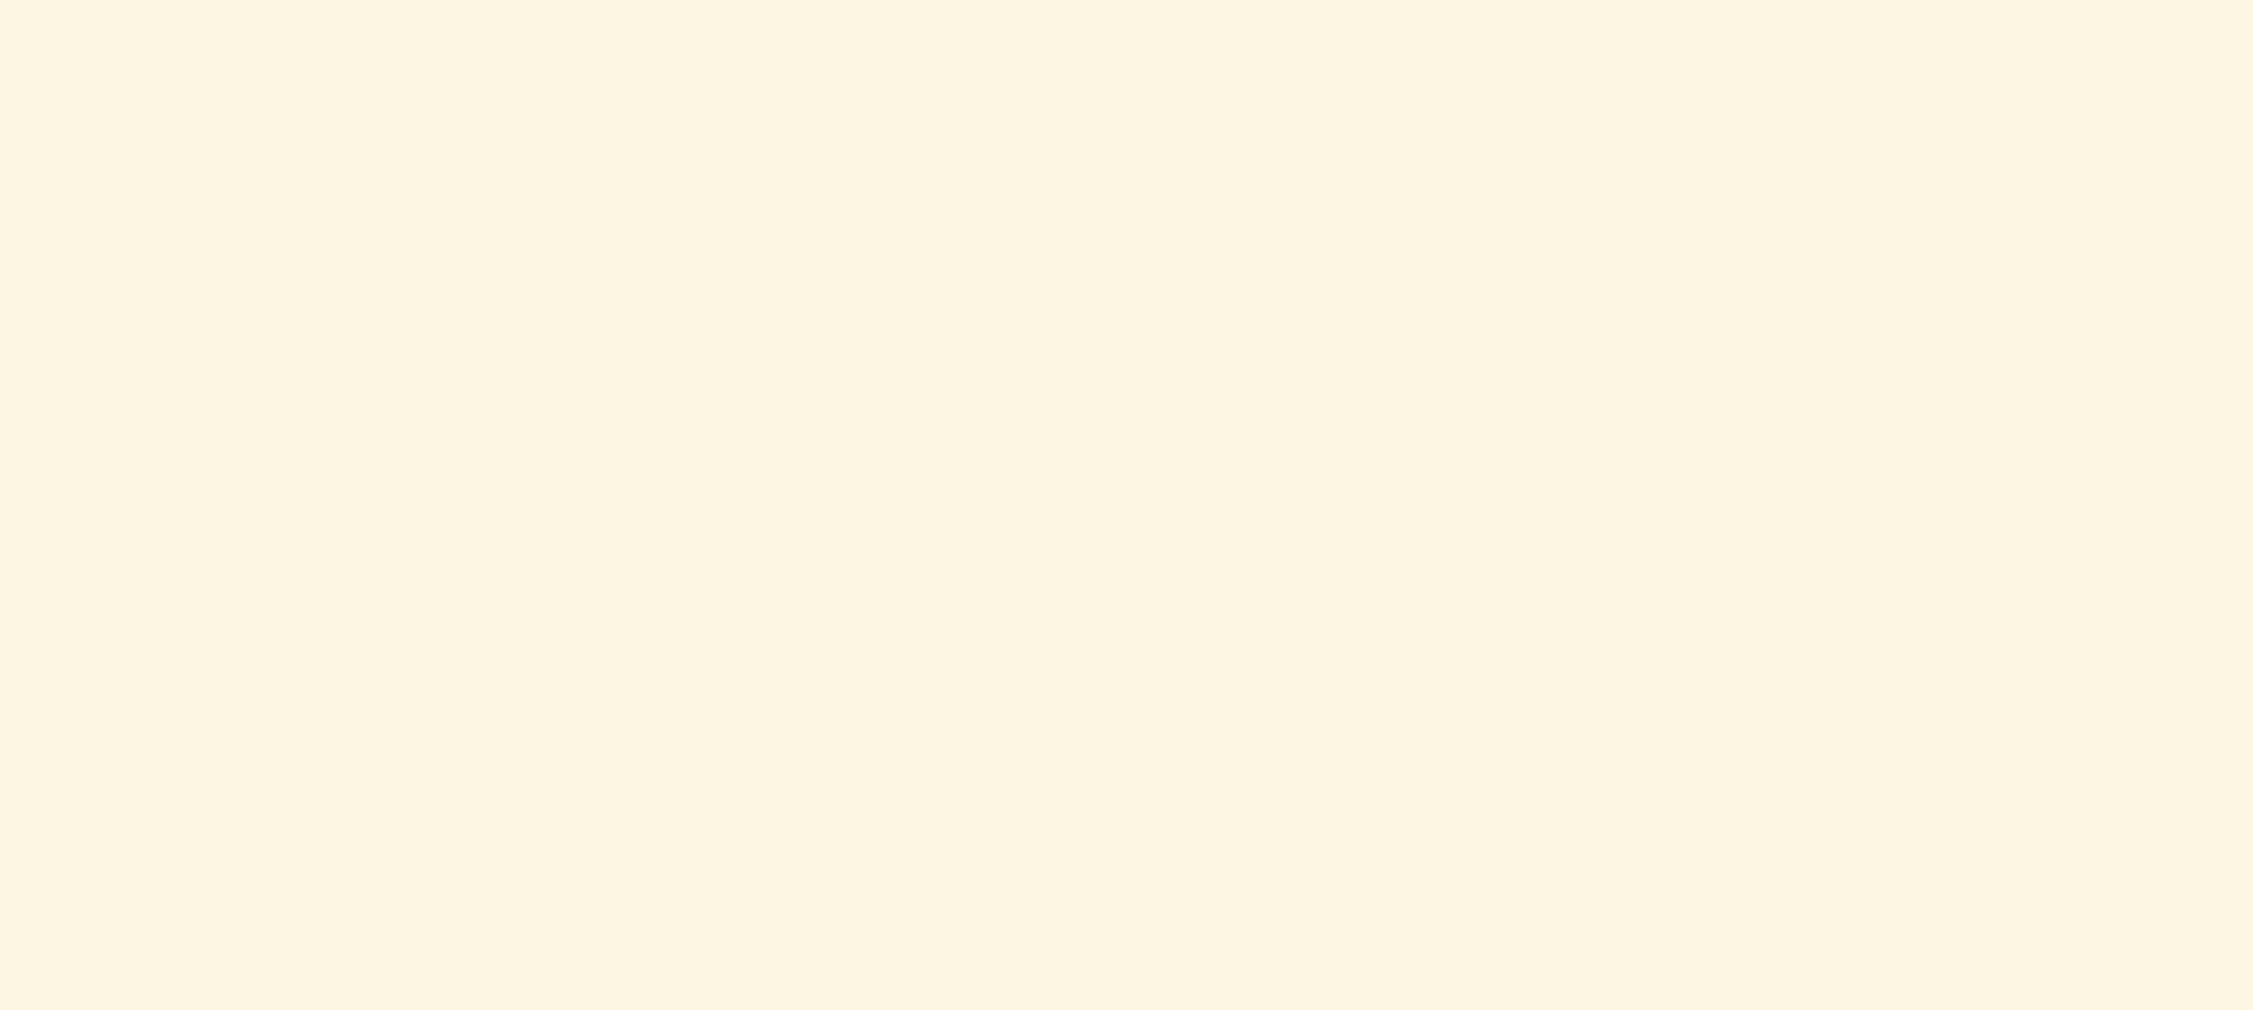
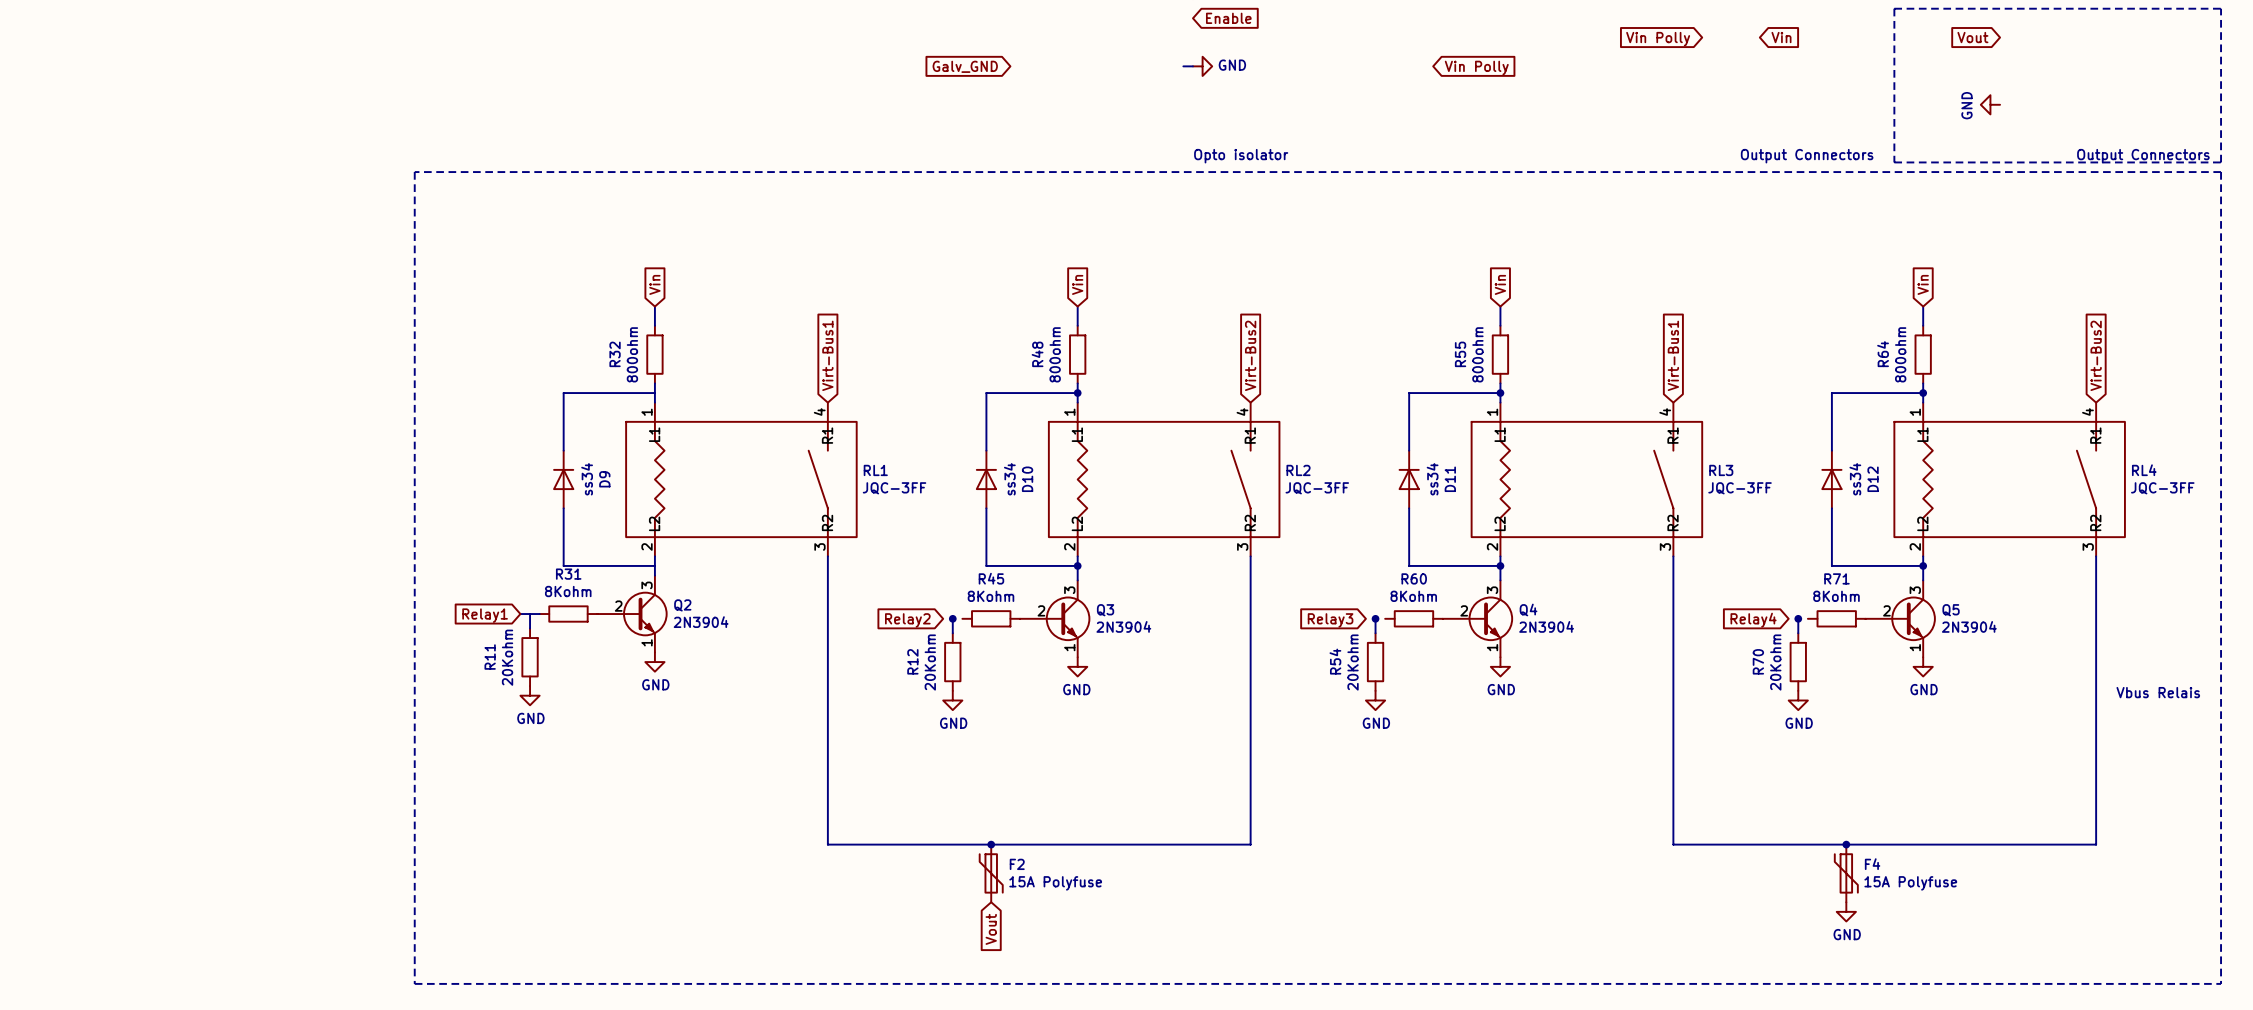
line: none -> (1894, 8) (2221, 8) (2221, 162) (1894, 162) (1894, 8)
global label: none -> Enable (1228, 18)
global label: none -> Vin (1781, 37)
global label: none -> Vout (1972, 37)
global label: none -> Vin Polly (1658, 39)
wire: none -> (1183, 66) (1192, 66)
power symbol: none -> GND (1202, 66)
global label: none -> Galv_GND (965, 66)
global label: none -> Vin Polly (1476, 67)
power symbol: none -> GND (1990, 104)
text: none -> Opto isolator (1241, 156)
text: none -> Output Connectors (1807, 156)
text: none -> Output Connectors (2143, 156)
line: none -> (414, 172) (414, 983) (2221, 983) (2221, 172) (414, 172)
global label: none -> Vin (654, 284)
global label: none -> Vin (1077, 284)
global label: none -> Vin (1500, 284)
global label: none -> Vin (1923, 284)
wire: none -> (654, 306) (654, 325)
wire: none -> (1077, 306) (1077, 325)
wire: none -> (1500, 306) (1500, 325)
wire: none -> (1923, 306) (1923, 325)
R32: none -> 800ohm (654, 354)
R48: none -> 800ohm (1077, 354)
R55: none -> 800ohm (1500, 354)
R64: none -> 800ohm (1923, 354)
global label: none -> Virt-Bus1 (827, 355)
global label: none -> Virt-Bus2 (1250, 355)
global label: none -> Virt-Bus1 (1673, 355)
global label: none -> Virt-Bus2 (2096, 355)
wire: none -> (654, 383) (654, 402)
wire: none -> (1077, 383) (1077, 402)
wire: none -> (1500, 383) (1500, 402)
wire: none -> (1923, 383) (1923, 402)
wire: none -> (654, 393) (563, 393) (563, 450)
wire: none -> (1077, 393) (986, 393) (986, 450)
junction: none -> (1077, 393)
wire: none -> (1500, 393) (1409, 393) (1409, 450)
junction: none -> (1500, 393)
wire: none -> (1923, 393) (1831, 393) (1831, 450)
junction: none -> (1923, 393)
D9: none -> ss34 (563, 479)
RL1: none -> JQC-3FF (741, 479)
D10: none -> ss34 (986, 479)
RL2: none -> JQC-3FF (1164, 479)
D11: none -> ss34 (1409, 479)
RL3: none -> JQC-3FF (1586, 479)
D12: none -> ss34 (1831, 479)
RL4: none -> JQC-3FF (2009, 479)
wire: none -> (563, 508) (563, 565) (654, 565)
wire: none -> (986, 508) (986, 565) (1077, 565)
wire: none -> (1409, 508) (1409, 565) (1500, 565)
wire: none -> (1831, 508) (1831, 565) (1923, 565)
wire: none -> (654, 556) (654, 575)
wire: none -> (827, 556) (827, 844) (1250, 844) (1250, 556)
wire: none -> (1077, 556) (1077, 580)
wire: none -> (1500, 556) (1500, 580)
wire: none -> (1673, 556) (1673, 844) (2096, 844) (2096, 556)
wire: none -> (1923, 556) (1923, 580)
junction: none -> (1077, 565)
junction: none -> (1500, 565)
junction: none -> (1923, 565)
wire: none -> (520, 614) (539, 614)
wire: none -> (530, 614) (530, 628)
R31: none -> 8Kohm (568, 614)
Q2: none -> 2N3904 (632, 614)
global label: none -> Relay1 (485, 615)
wire: none -> (952, 618) (952, 633)
junction: none -> (952, 618)
R45: none -> 8Kohm (991, 618)
Q3: none -> 2N3904 (1055, 618)
wire: none -> (1375, 618) (1375, 633)
junction: none -> (1375, 618)
R60: none -> 8Kohm (1413, 618)
Q4: none -> 2N3904 (1477, 618)
wire: none -> (1798, 618) (1798, 633)
junction: none -> (1798, 618)
R71: none -> 8Kohm (1836, 618)
Q5: none -> 2N3904 (1900, 618)
global label: none -> Relay2 (907, 620)
global label: none -> Relay3 (1330, 620)
global label: none -> Relay4 (1753, 620)
R11: none -> 20Kohm (530, 657)
power symbol: none -> GND (654, 662)
R12: none -> 20Kohm (952, 662)
R54: none -> 20Kohm (1375, 662)
R70: none -> 20Kohm (1798, 662)
power symbol: none -> GND (1077, 666)
power symbol: none -> GND (1500, 666)
power symbol: none -> GND (1923, 666)
text: none -> Vbus Relais (2158, 692)
power symbol: none -> GND (530, 695)
power symbol: none -> GND (952, 700)
power symbol: none -> GND (1375, 700)
power symbol: none -> GND (1798, 700)
junction: none -> (991, 844)
junction: none -> (1846, 844)
F2: none -> 15A Polyfuse (991, 873)
F4: none -> 15A Polyfuse (1846, 873)
power symbol: none -> GND (1846, 911)
global label: none -> Vout (991, 929)

